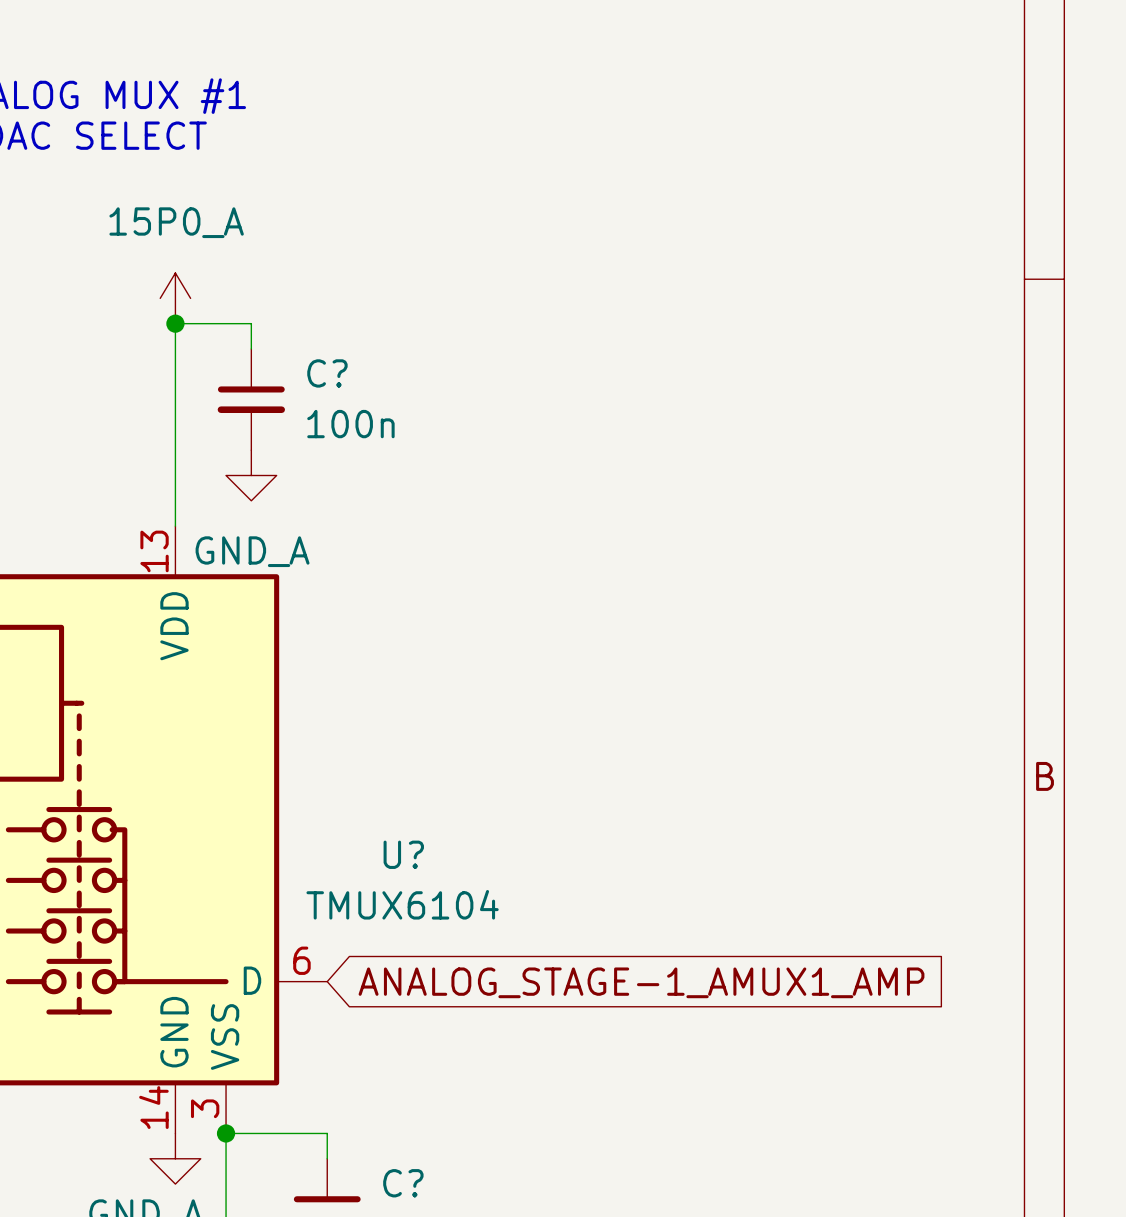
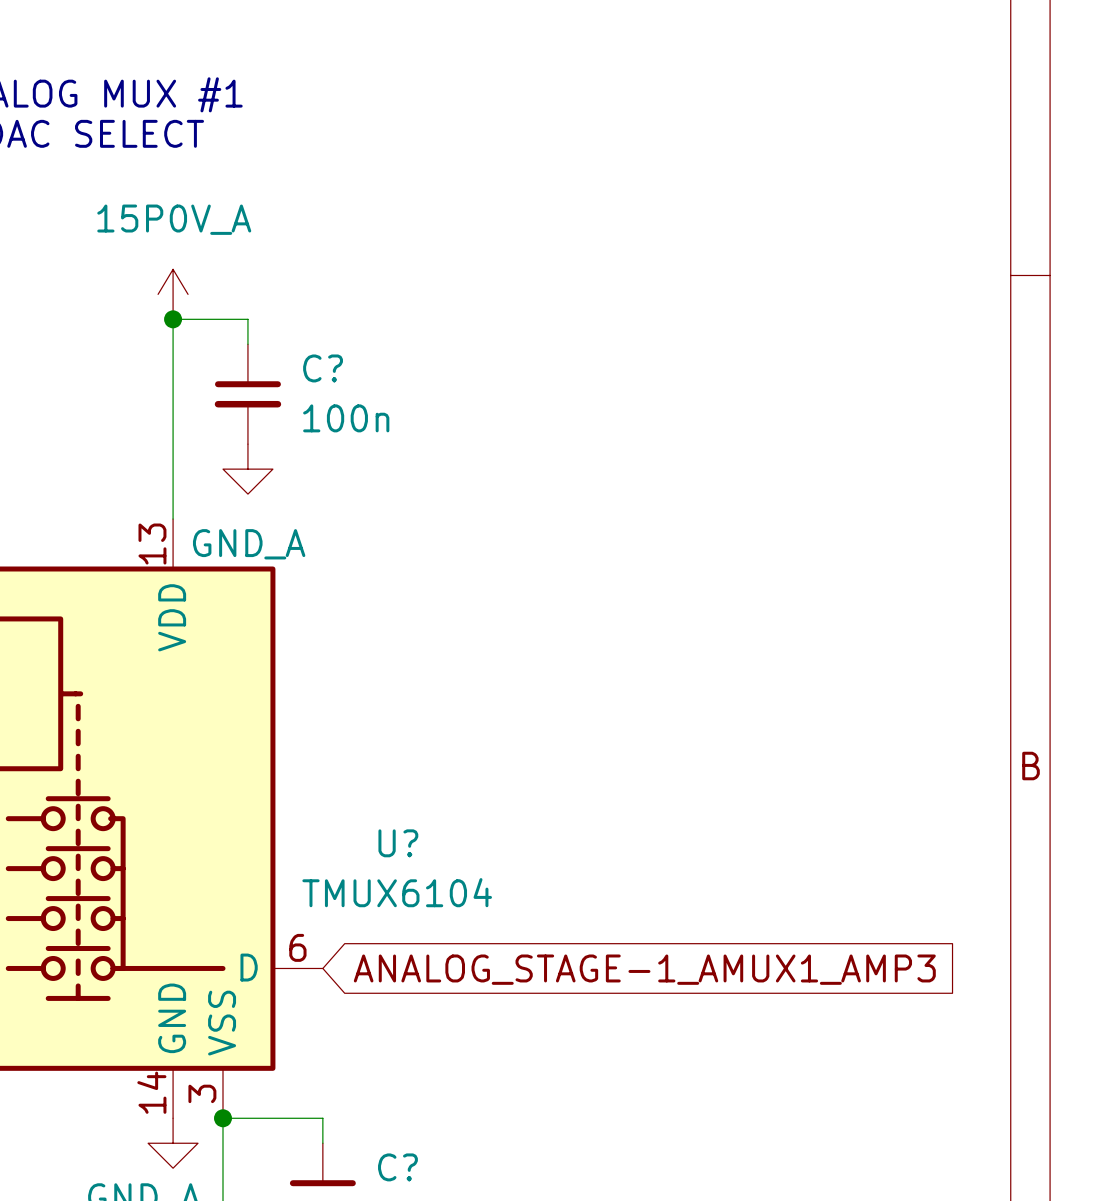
power symbol: 15P0_A (175, 298) -> 15P0V_A (173, 294)
global label: ANALOG_STAGE-1_AMUX1_AMP (641, 982) -> ANALOG_STAGE-1_AMUX1_AMP3 (644, 969)

